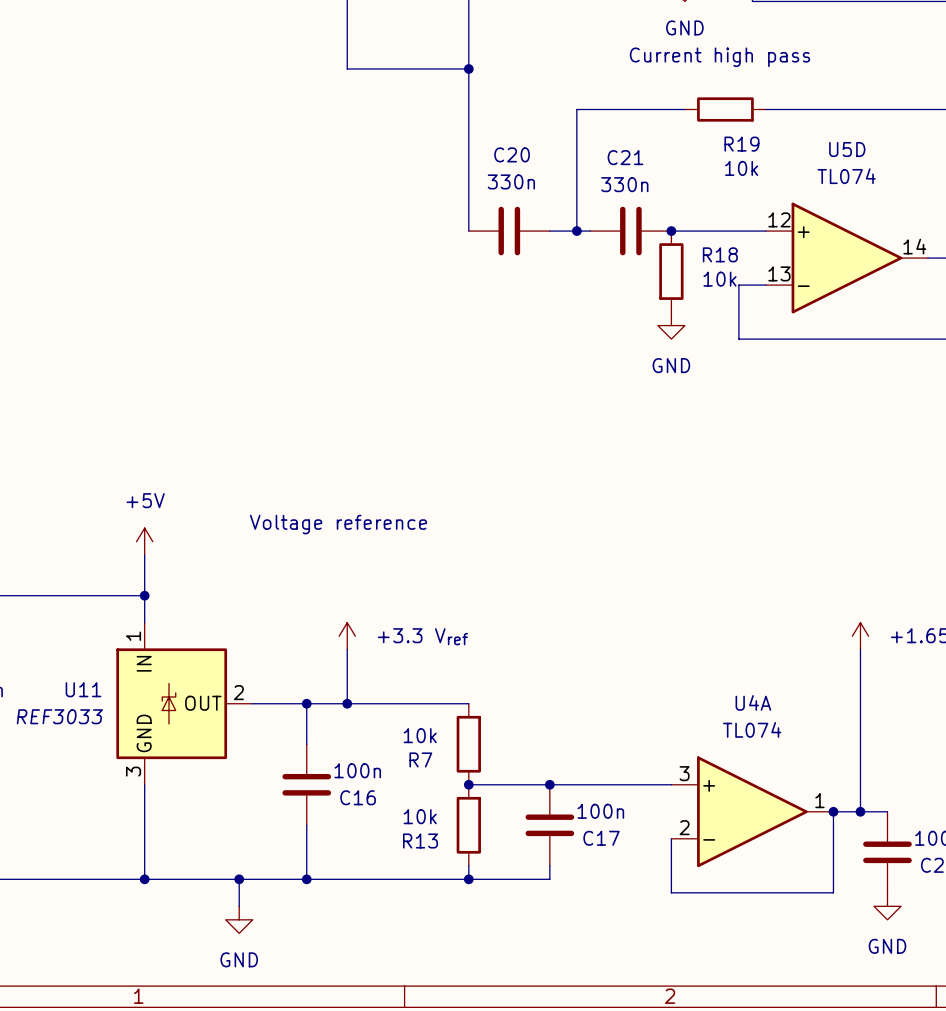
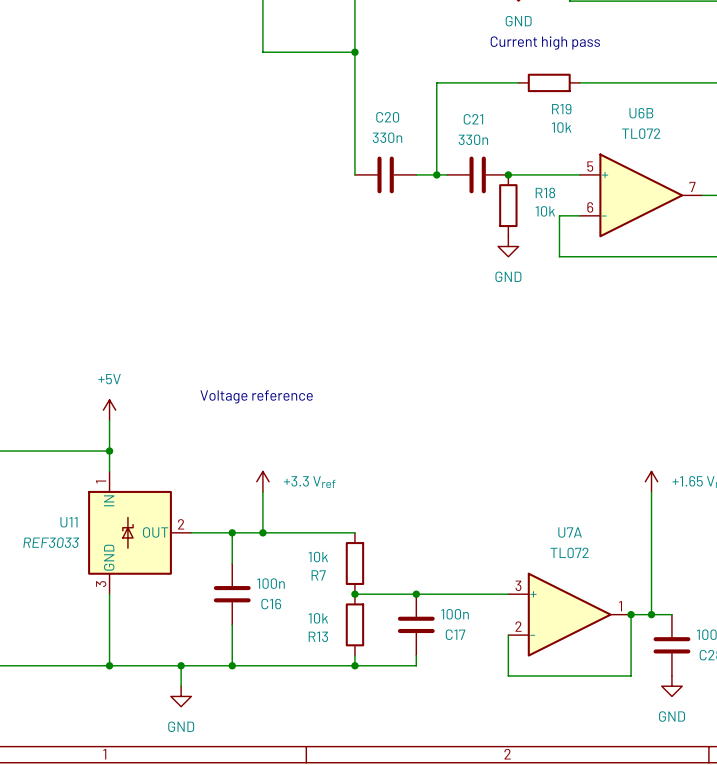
U5D name: U5D (847, 149) -> U6B (641, 113)
U5D value: TL074 (846, 176) -> TL072 (641, 133)
U5D pin number: 12 (779, 219) -> 5 (590, 166)
U5D pin number: 14 (914, 246) -> 7 (692, 186)
U5D pin number: 13 (779, 273) -> 6 (590, 207)
U4A name: U4A (753, 702) -> U7A (570, 532)
U4A value: TL074 (752, 729) -> TL072 (569, 552)

